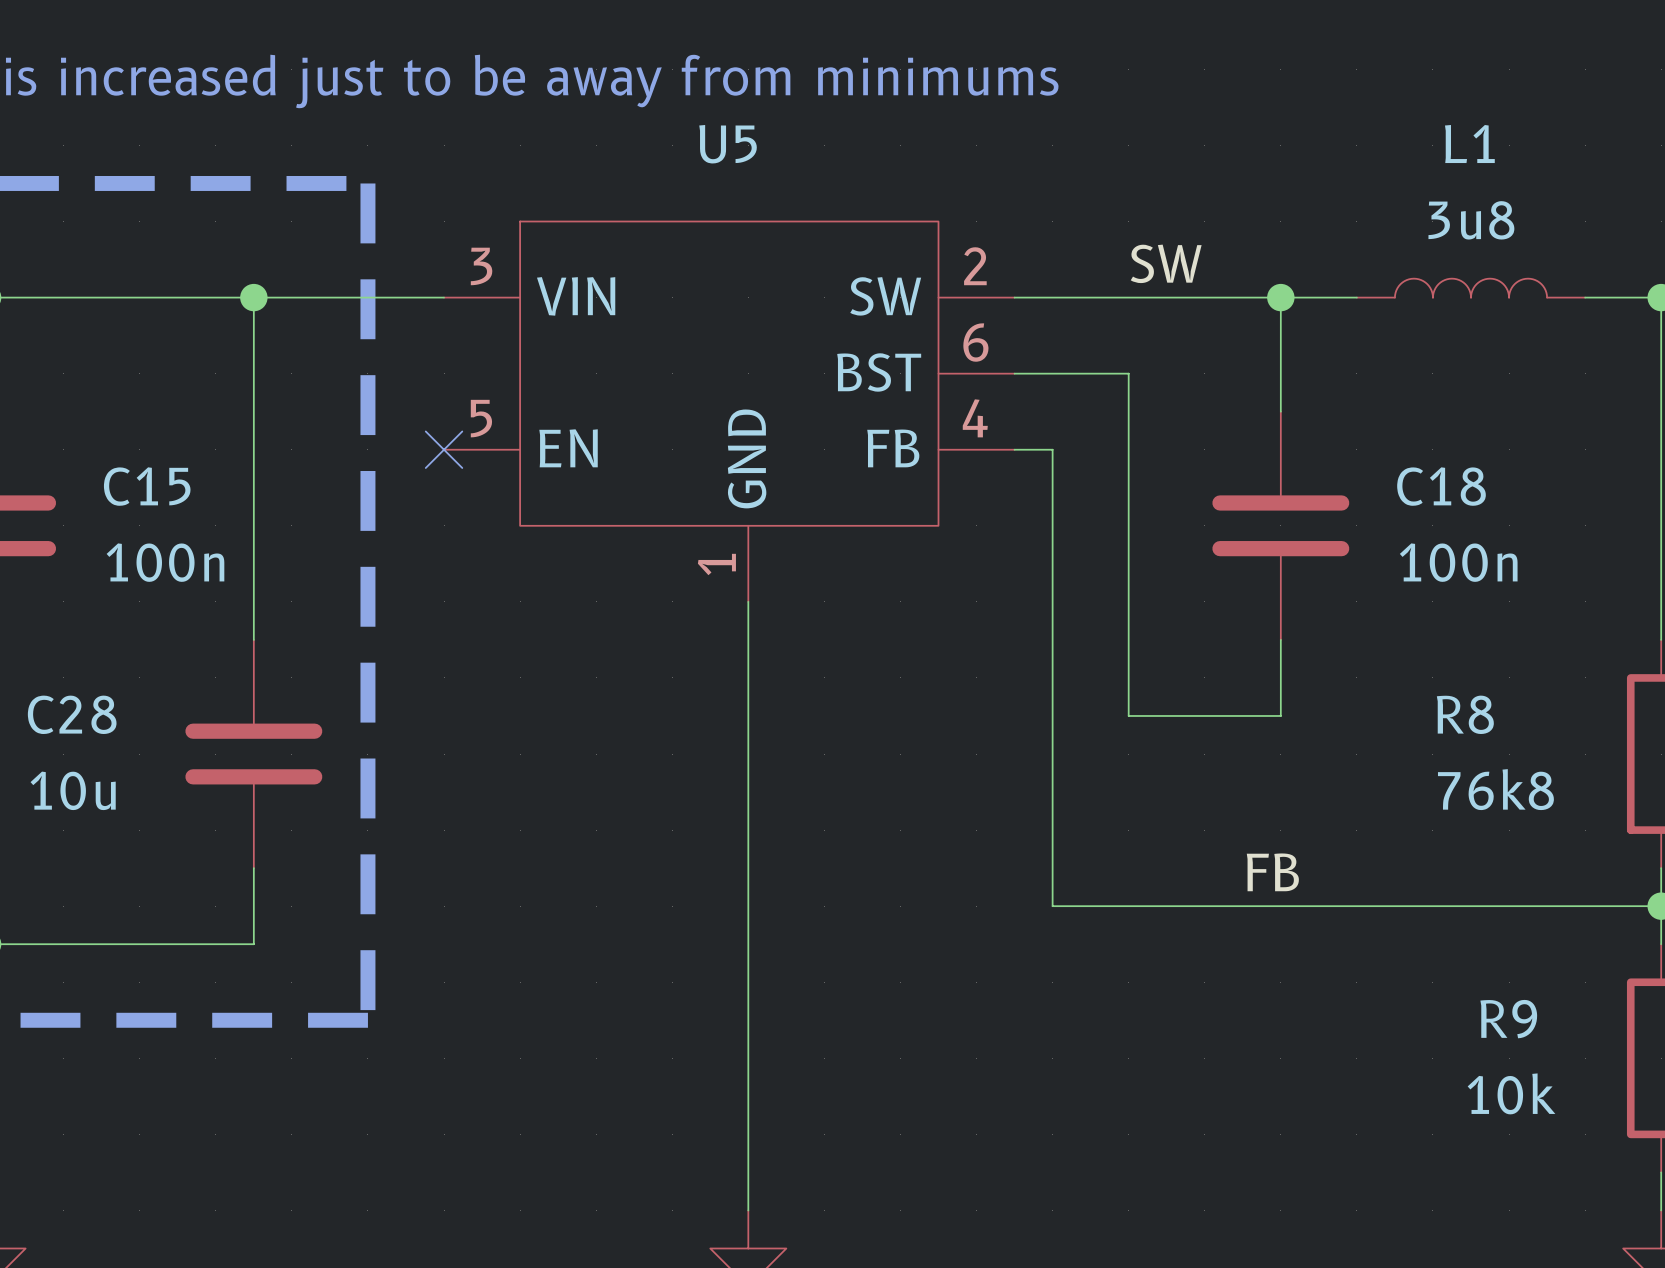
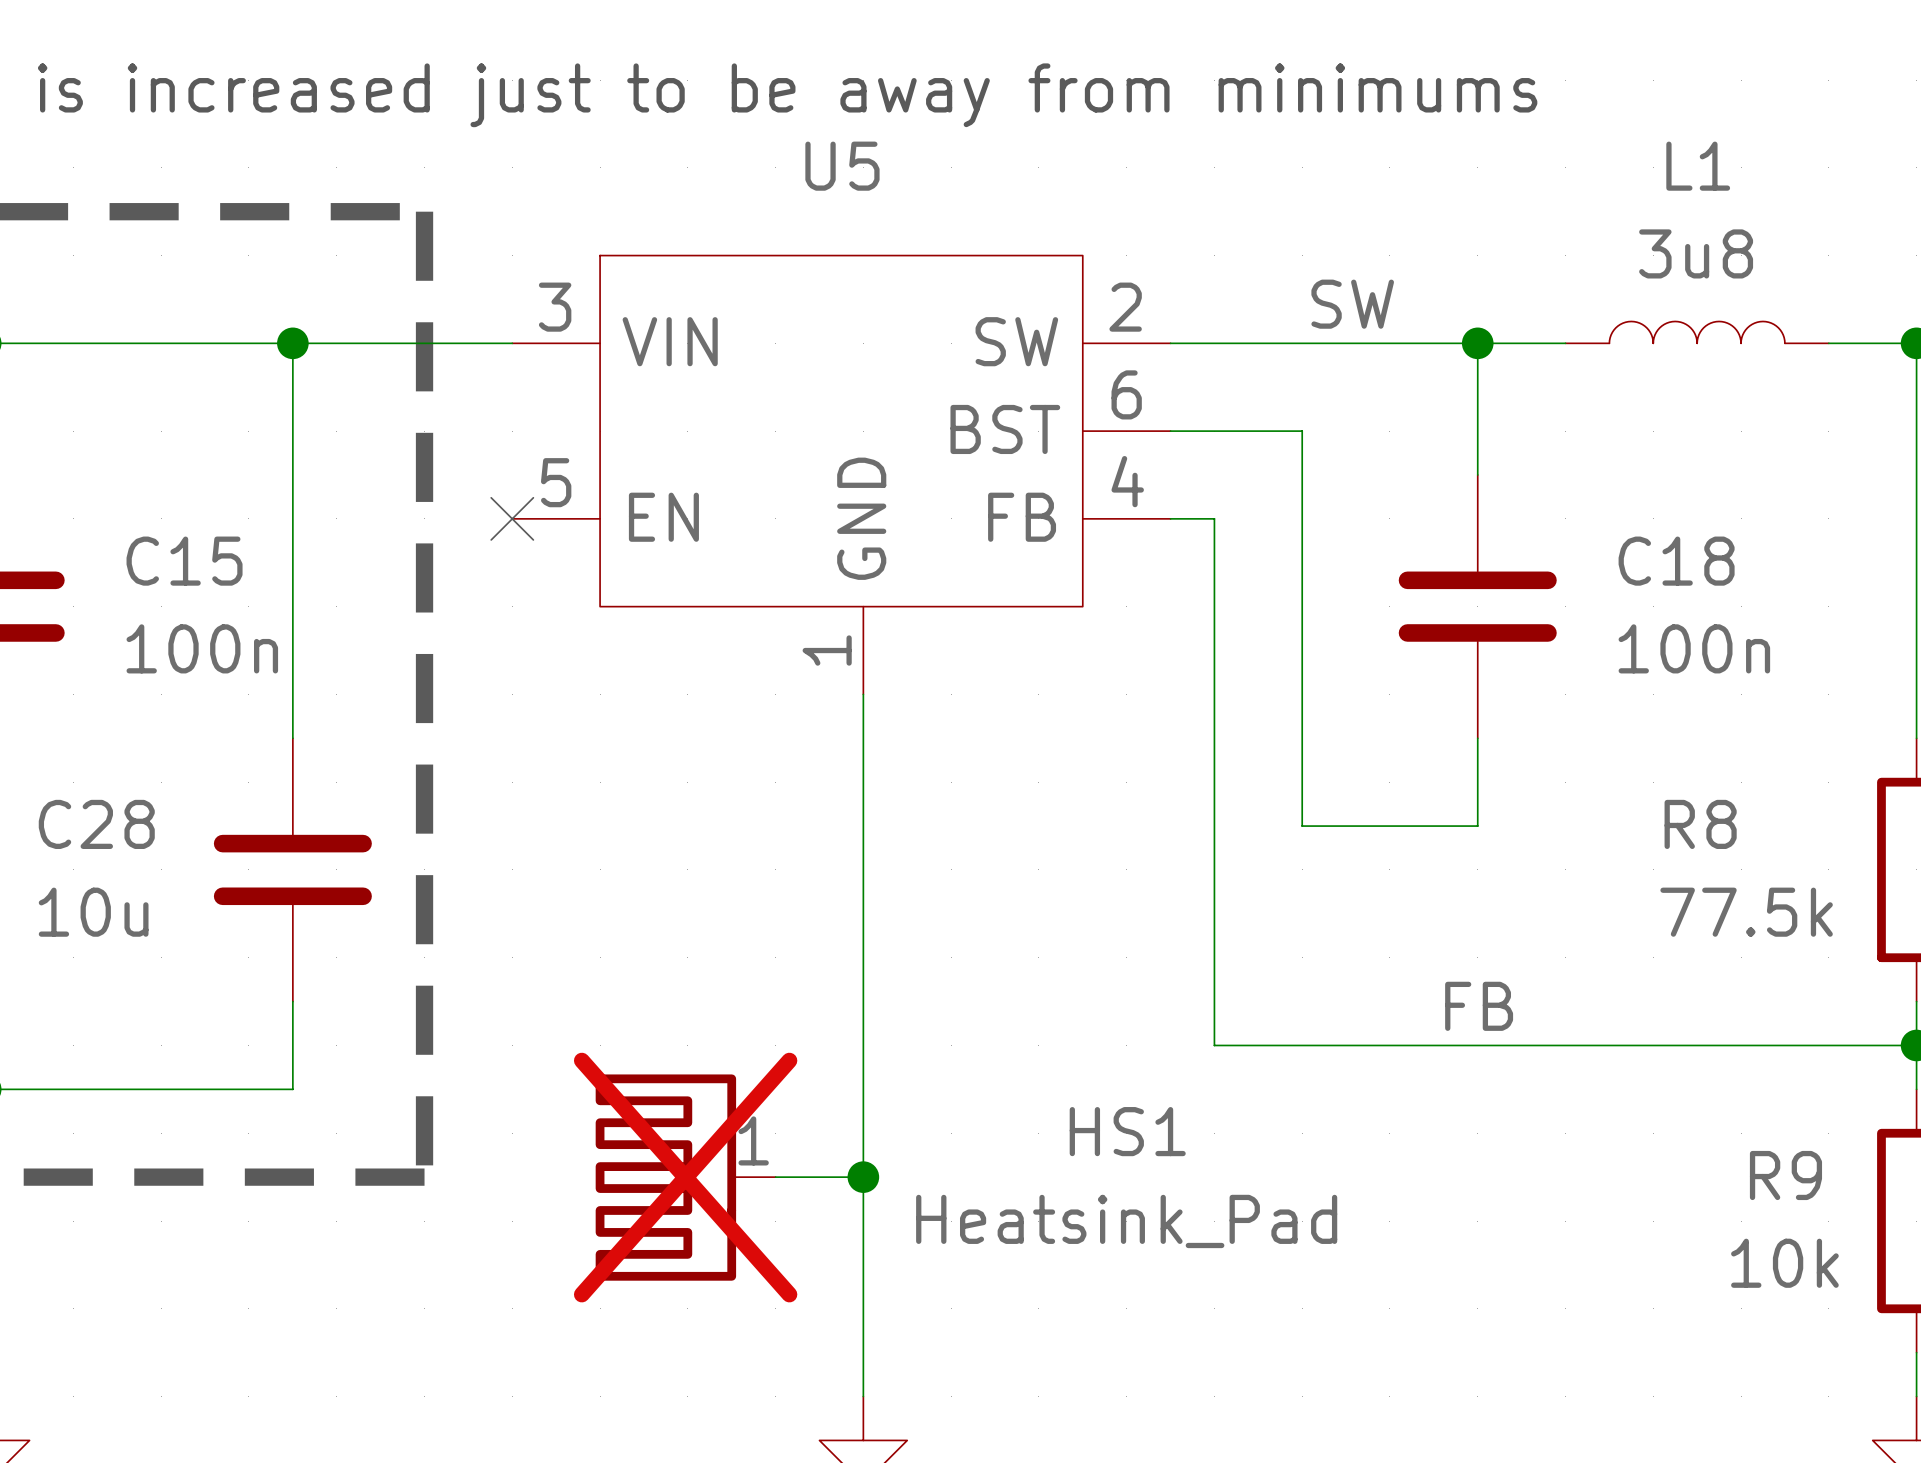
R8 value: 76k8 (1495, 789) -> 77.5k (1746, 912)
R9 name position: R9 (1508, 1019) -> R9 (1785, 1175)
HS1: none -> Heatsink_Pad (685, 1177)
wire: none -> (775, 1177) (863, 1177)
junction: none -> (863, 1177)
R9 value position: 10k (1511, 1093) -> 10k (1784, 1263)

